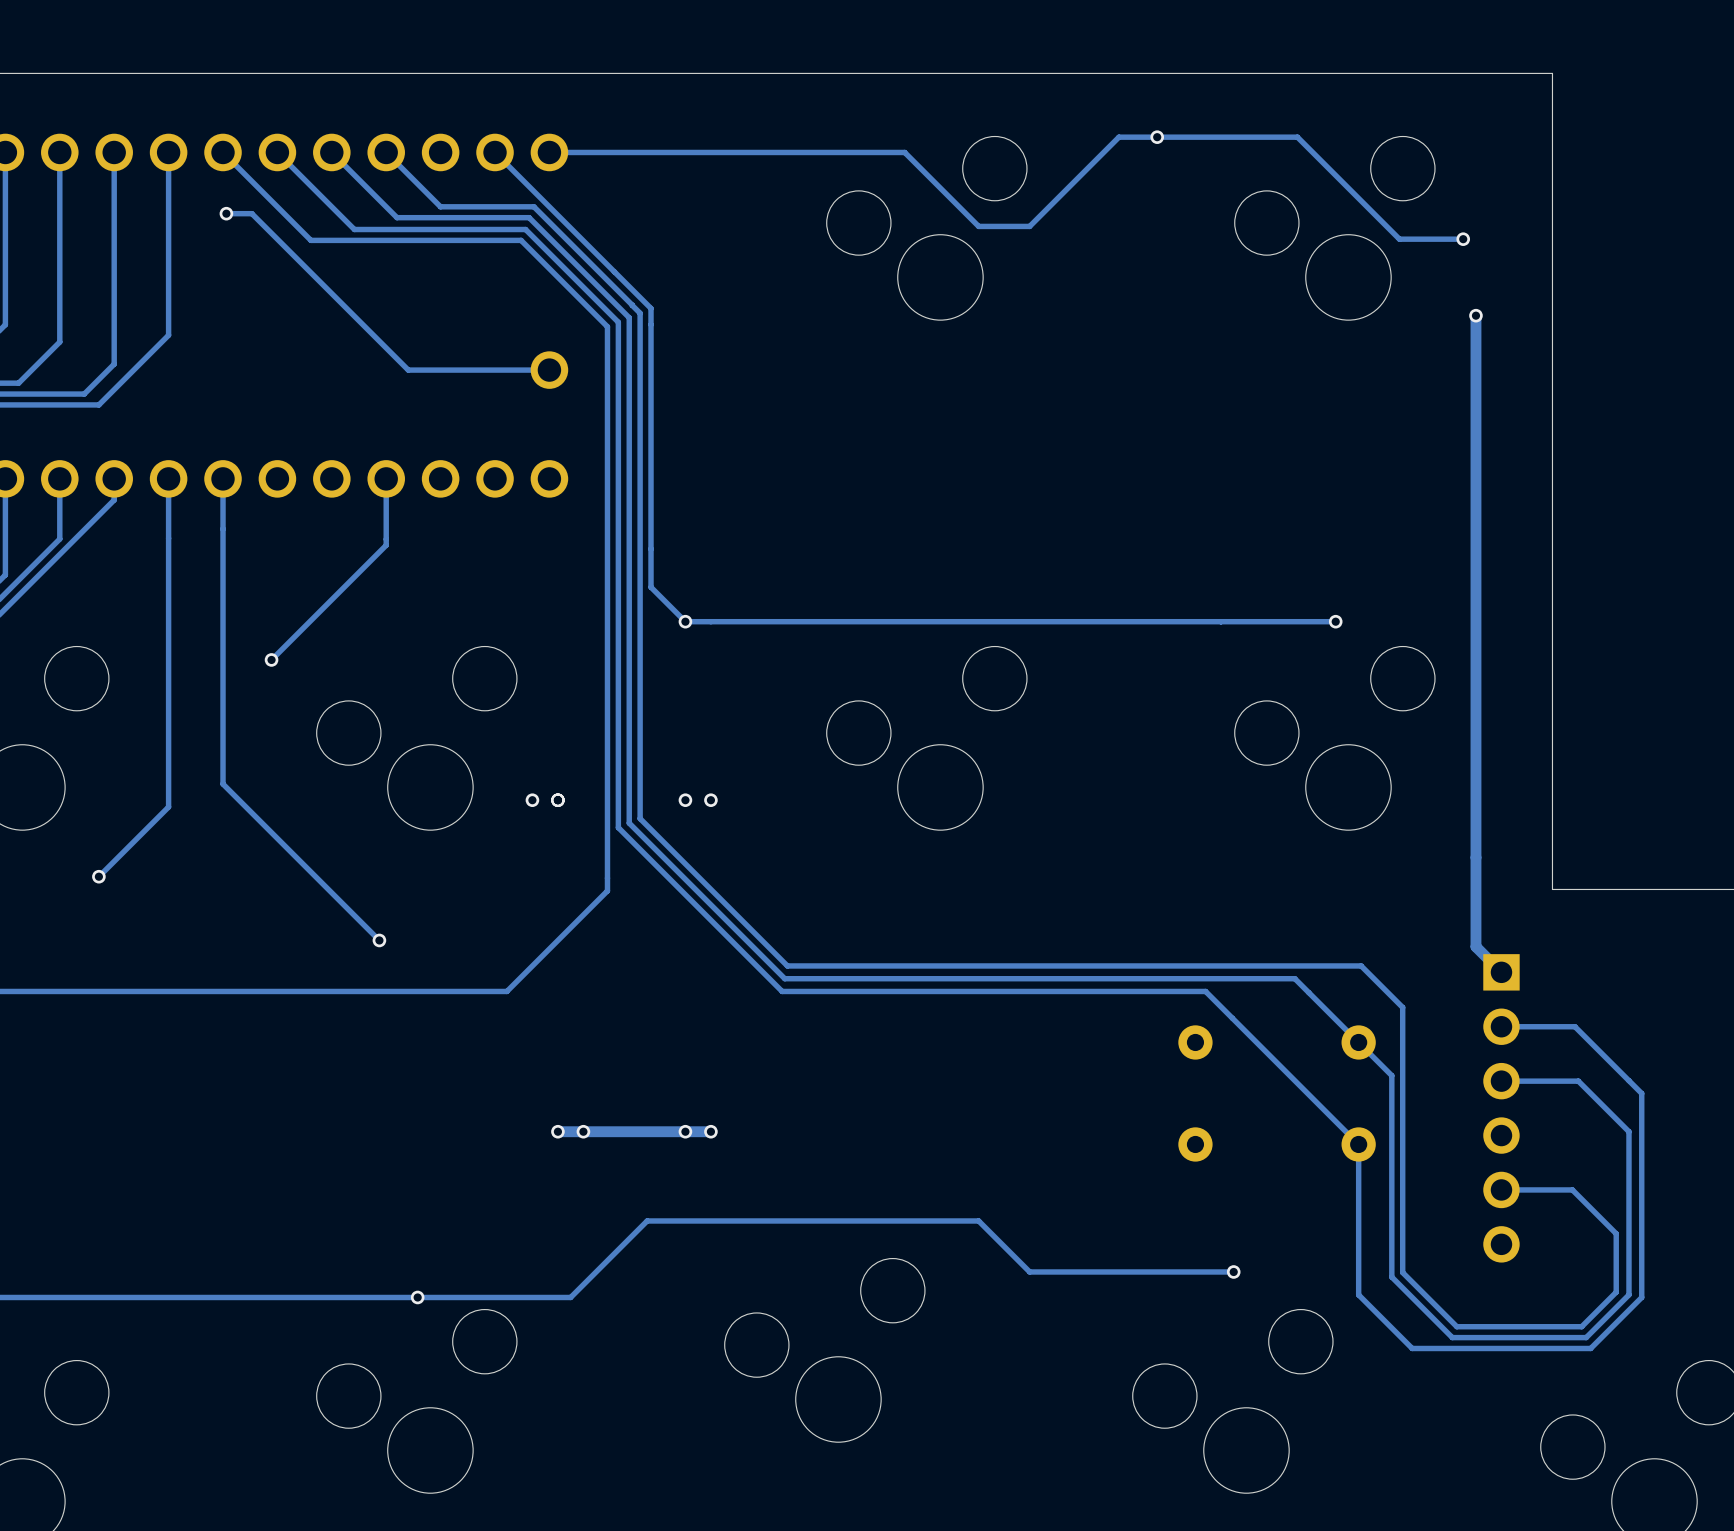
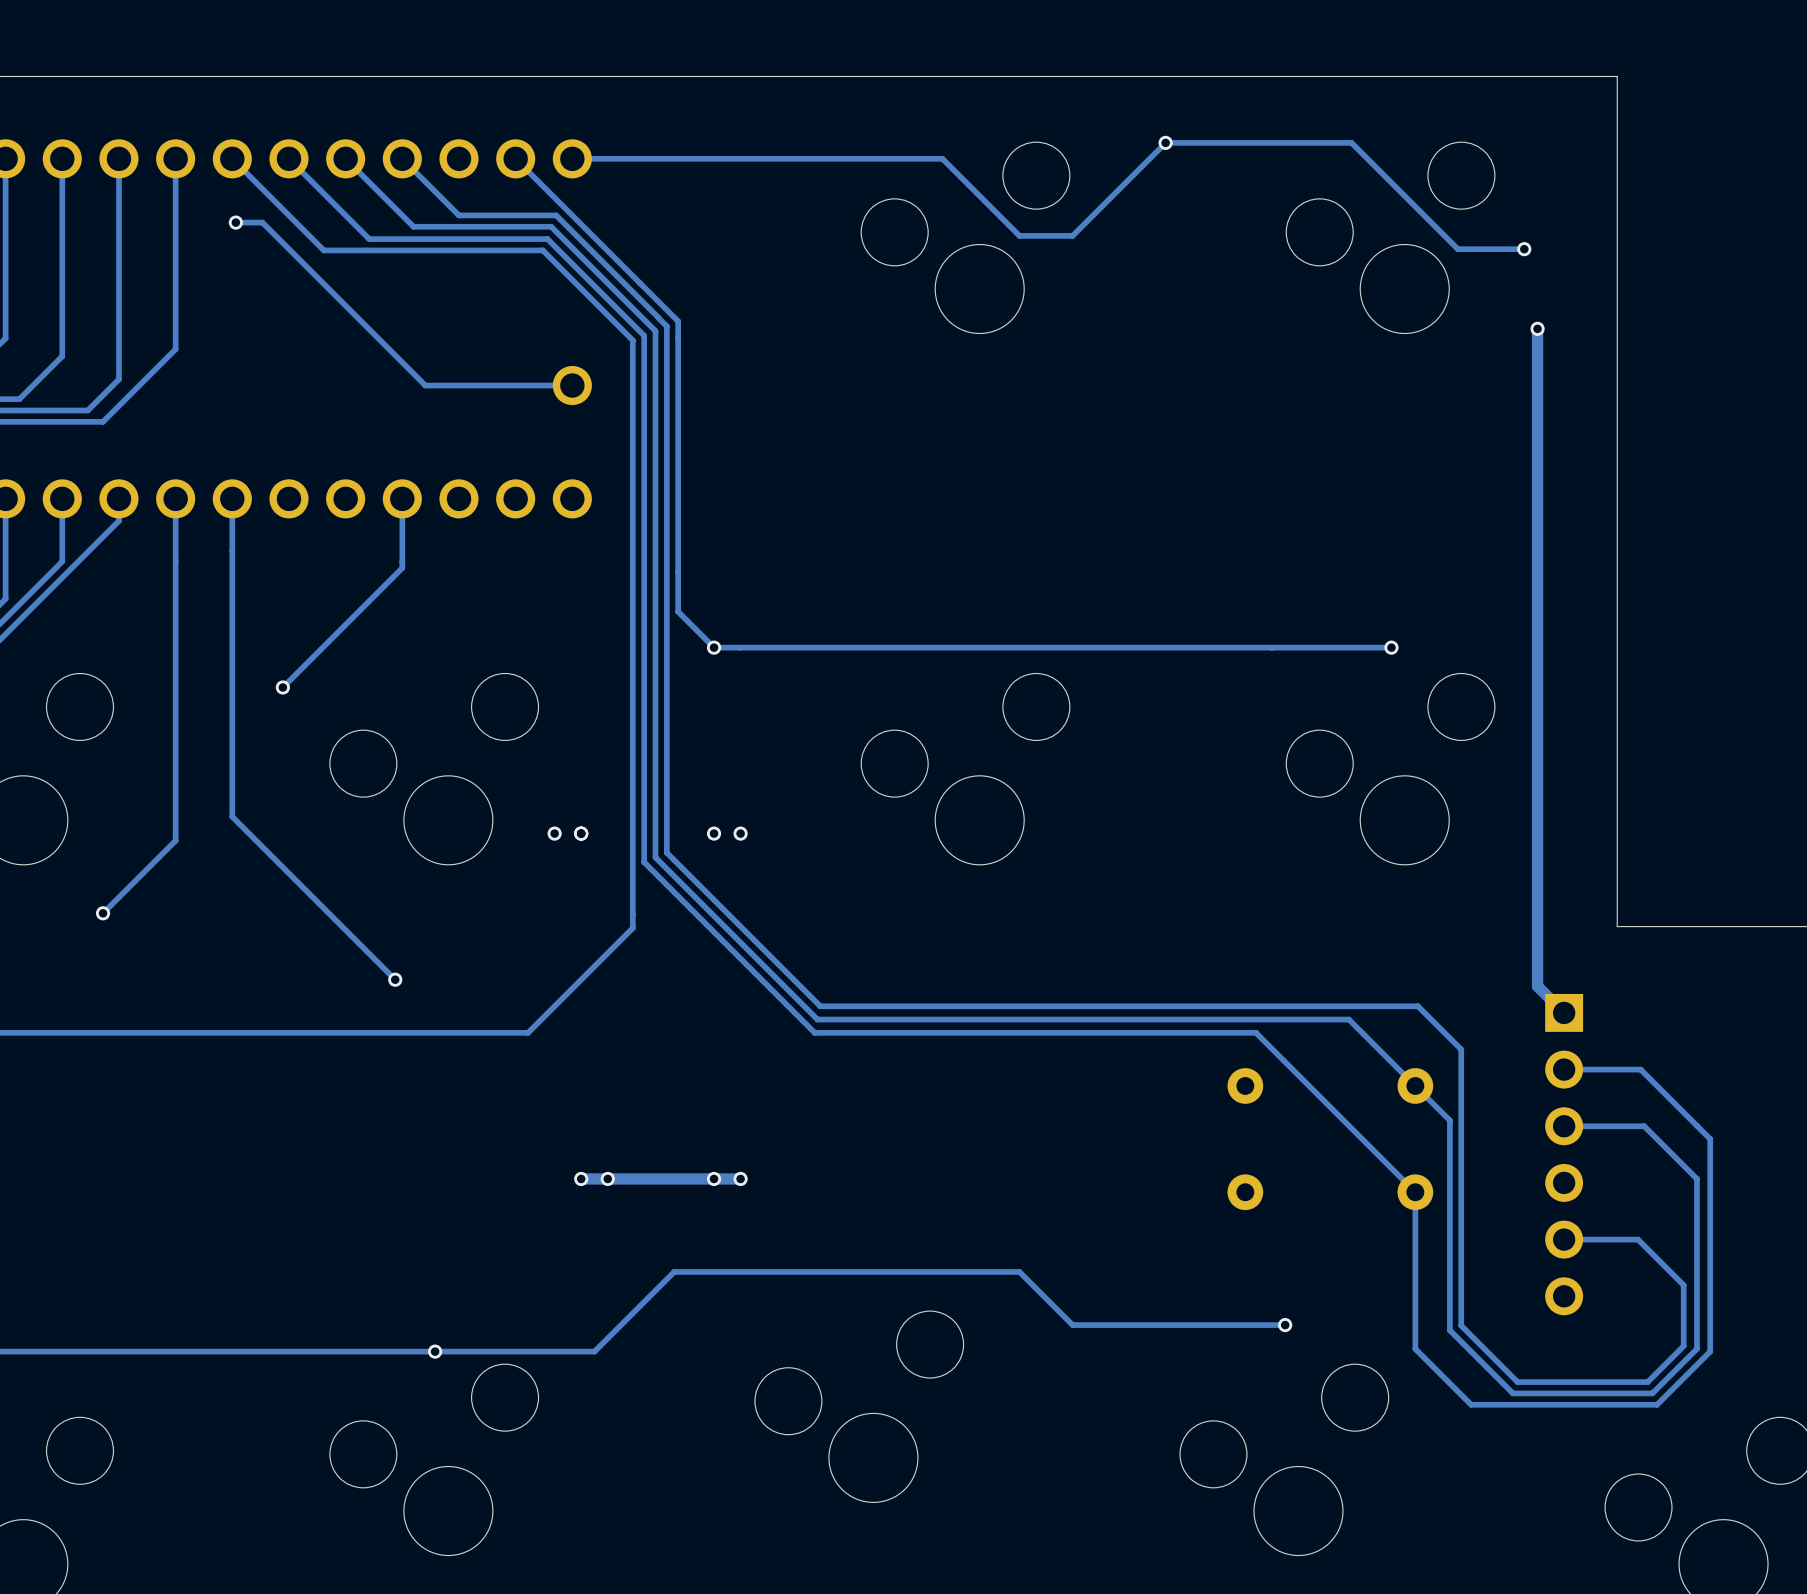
via position: (1157, 137) -> (1165, 142)

